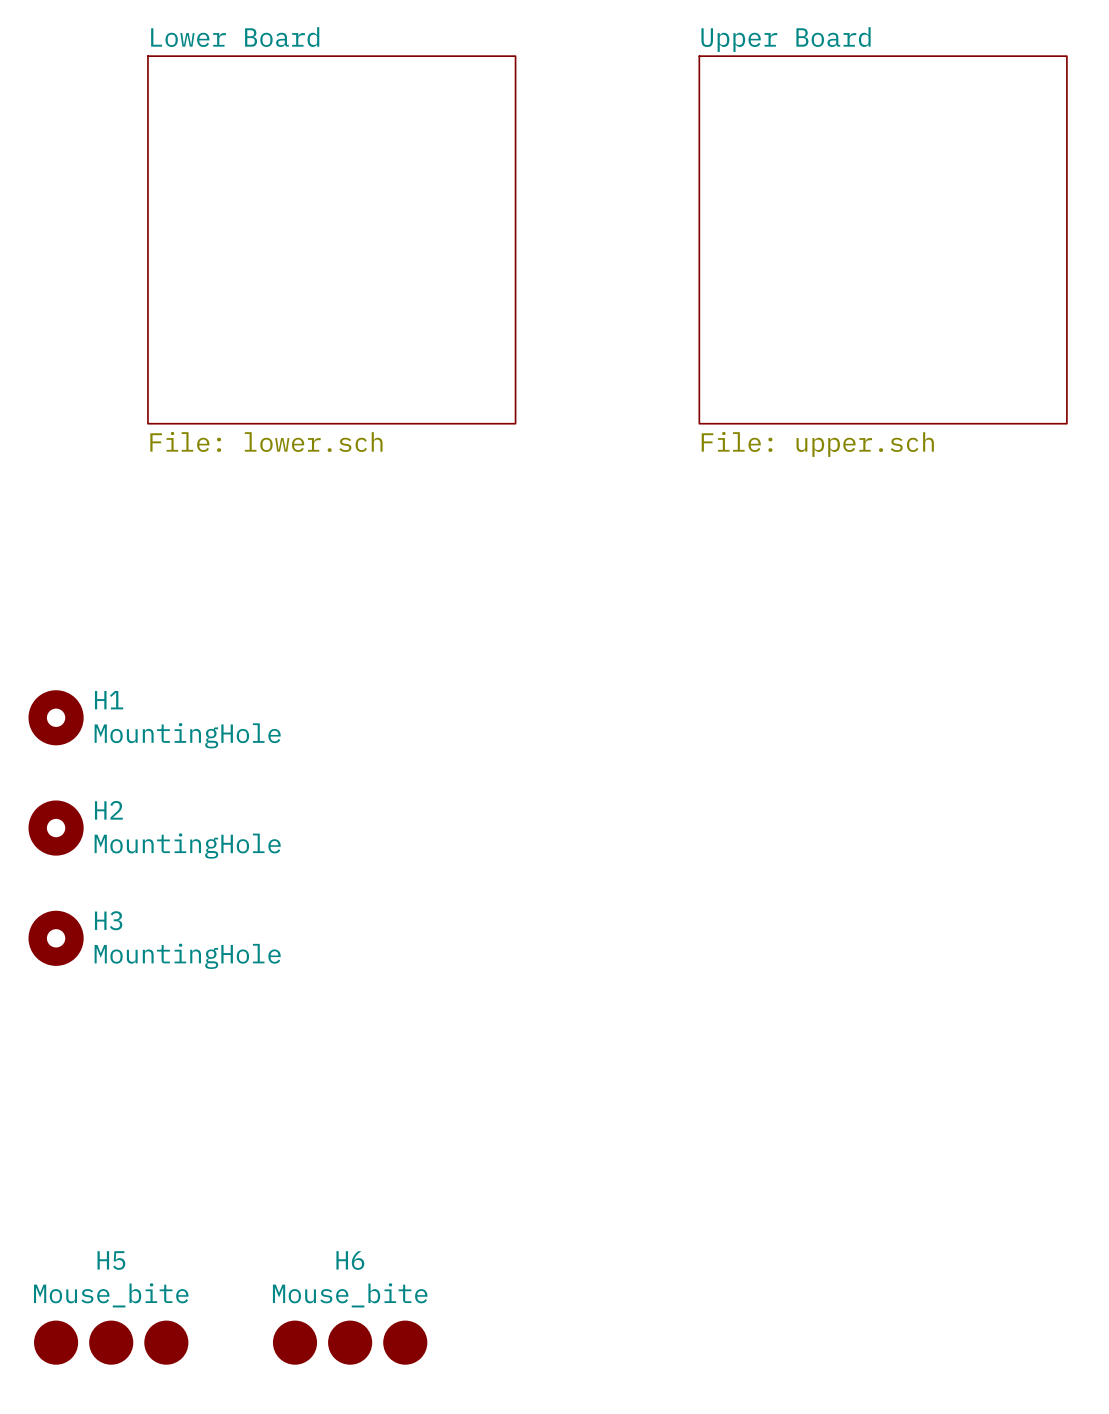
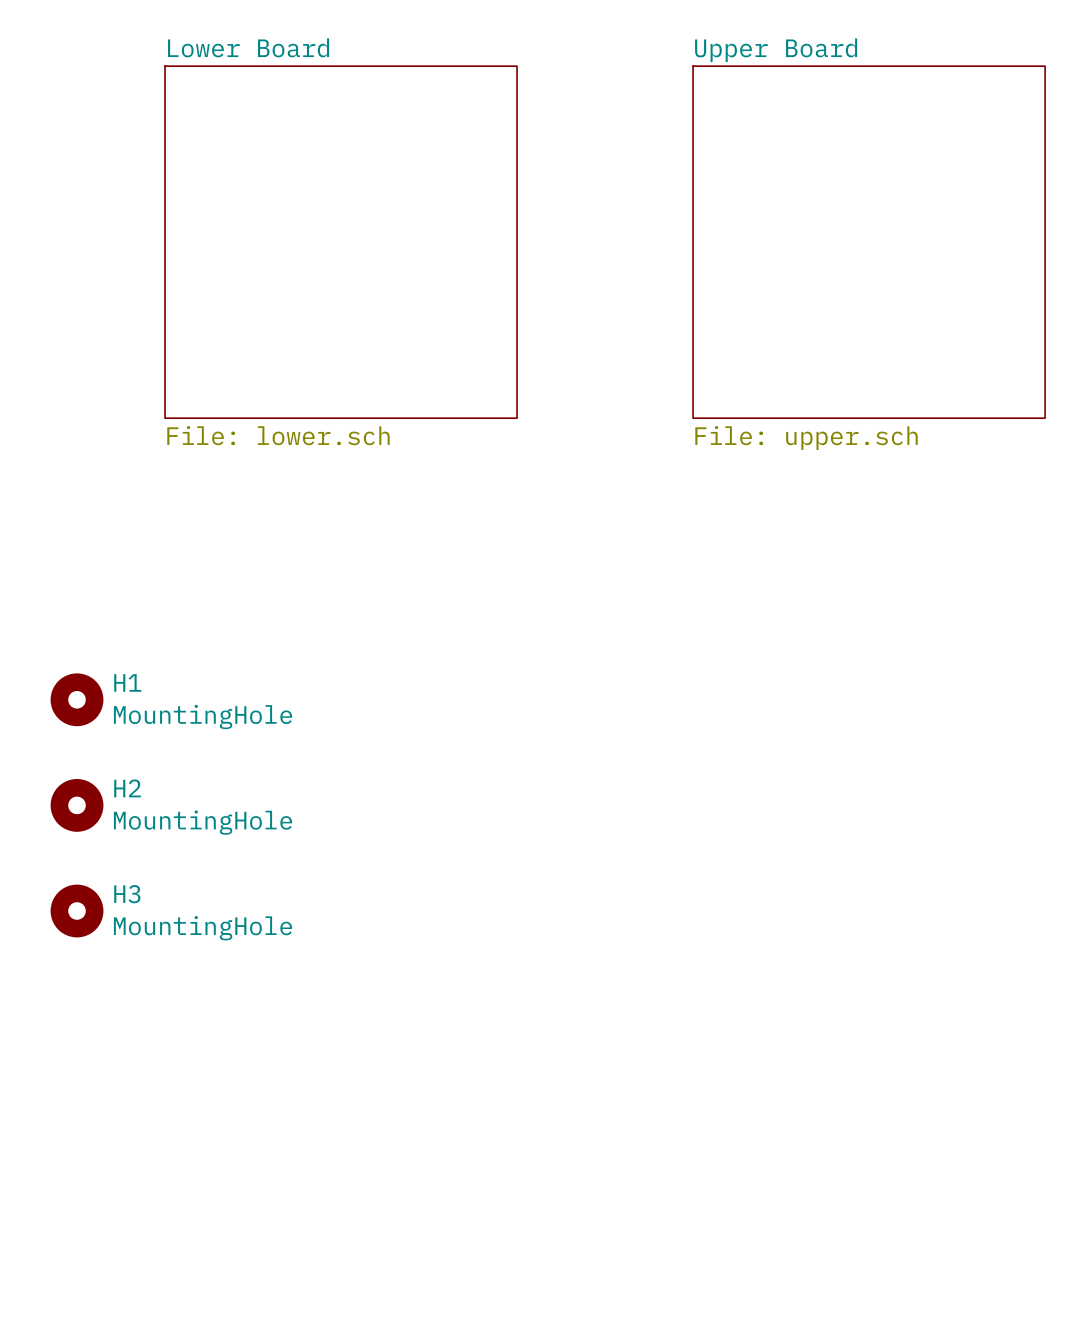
H5: Mouse_bite (111, 1342) -> none
H6: Mouse_bite (350, 1342) -> none

